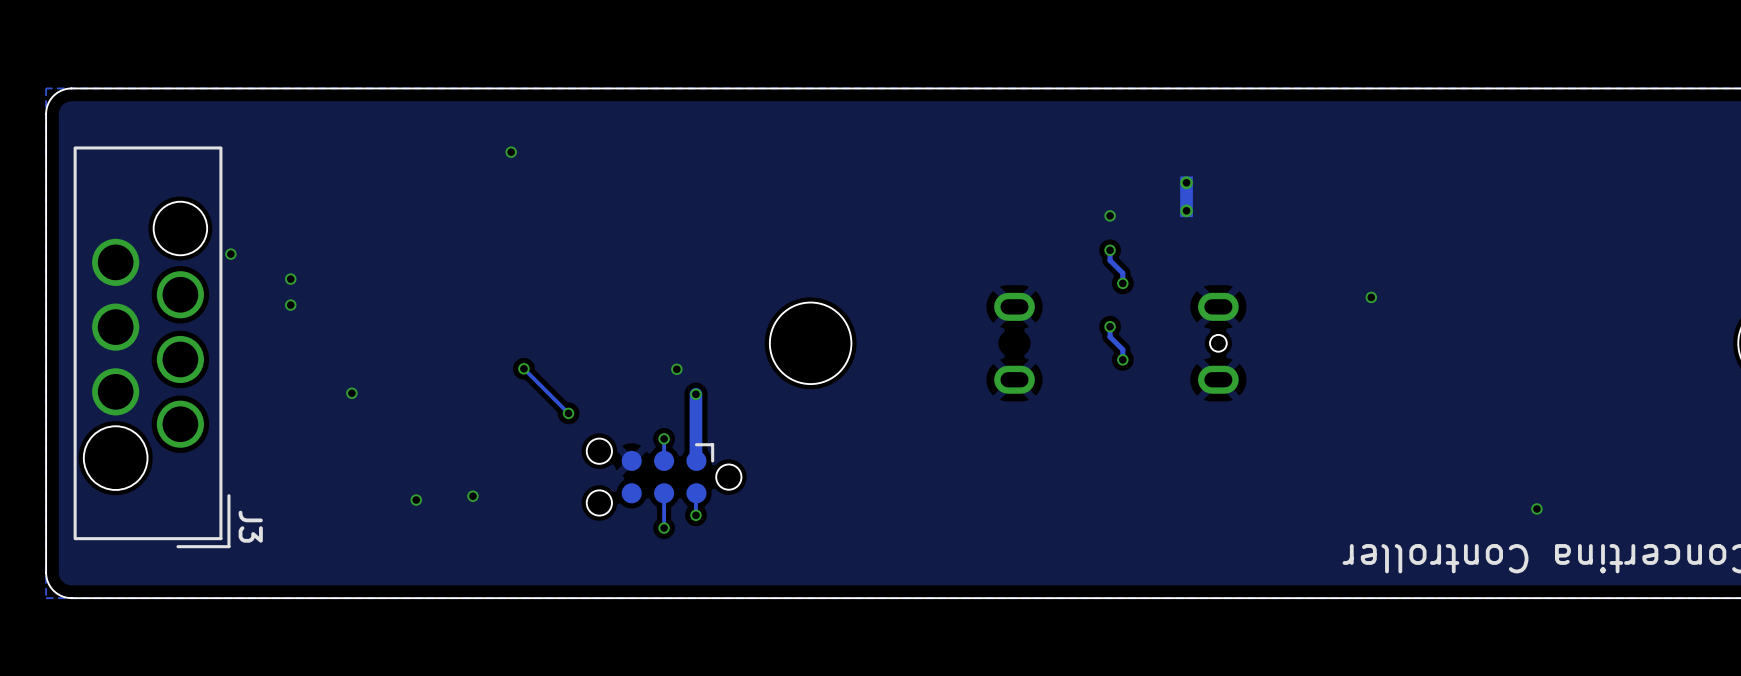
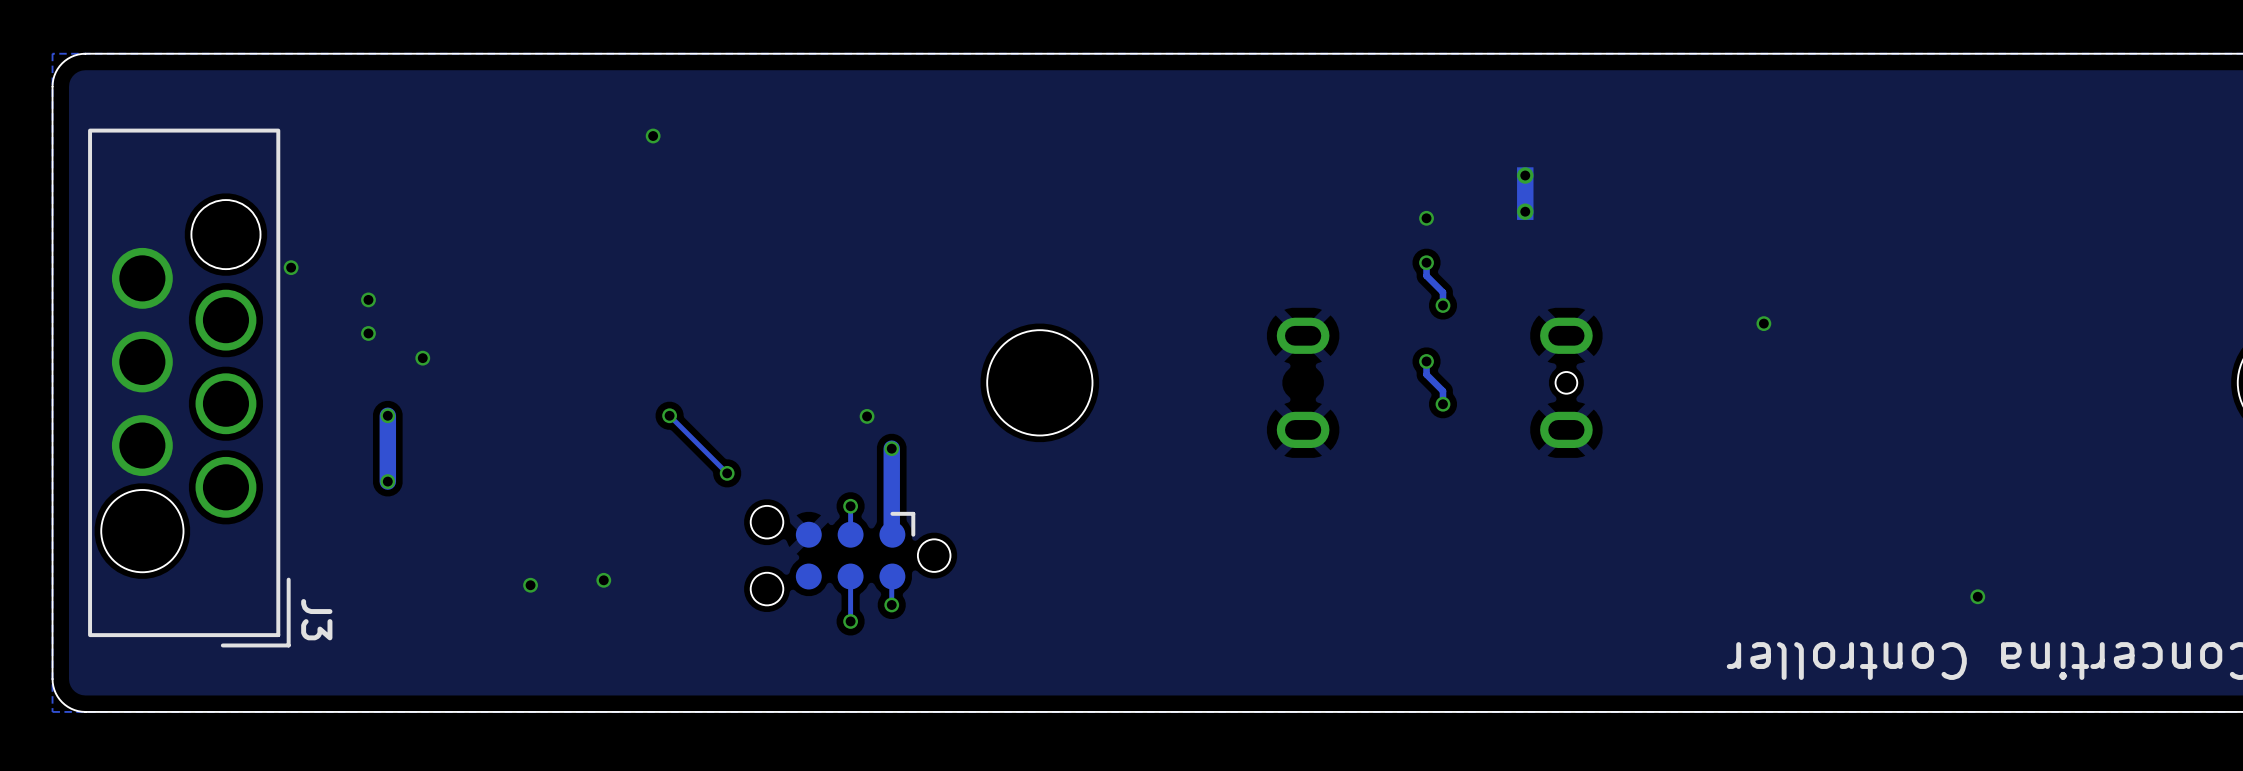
via: none -> (422, 358)
track: none -> (387, 415) (387, 481)
via: none -> (387, 415)
via: (351, 393) -> none
via: none -> (387, 481)

